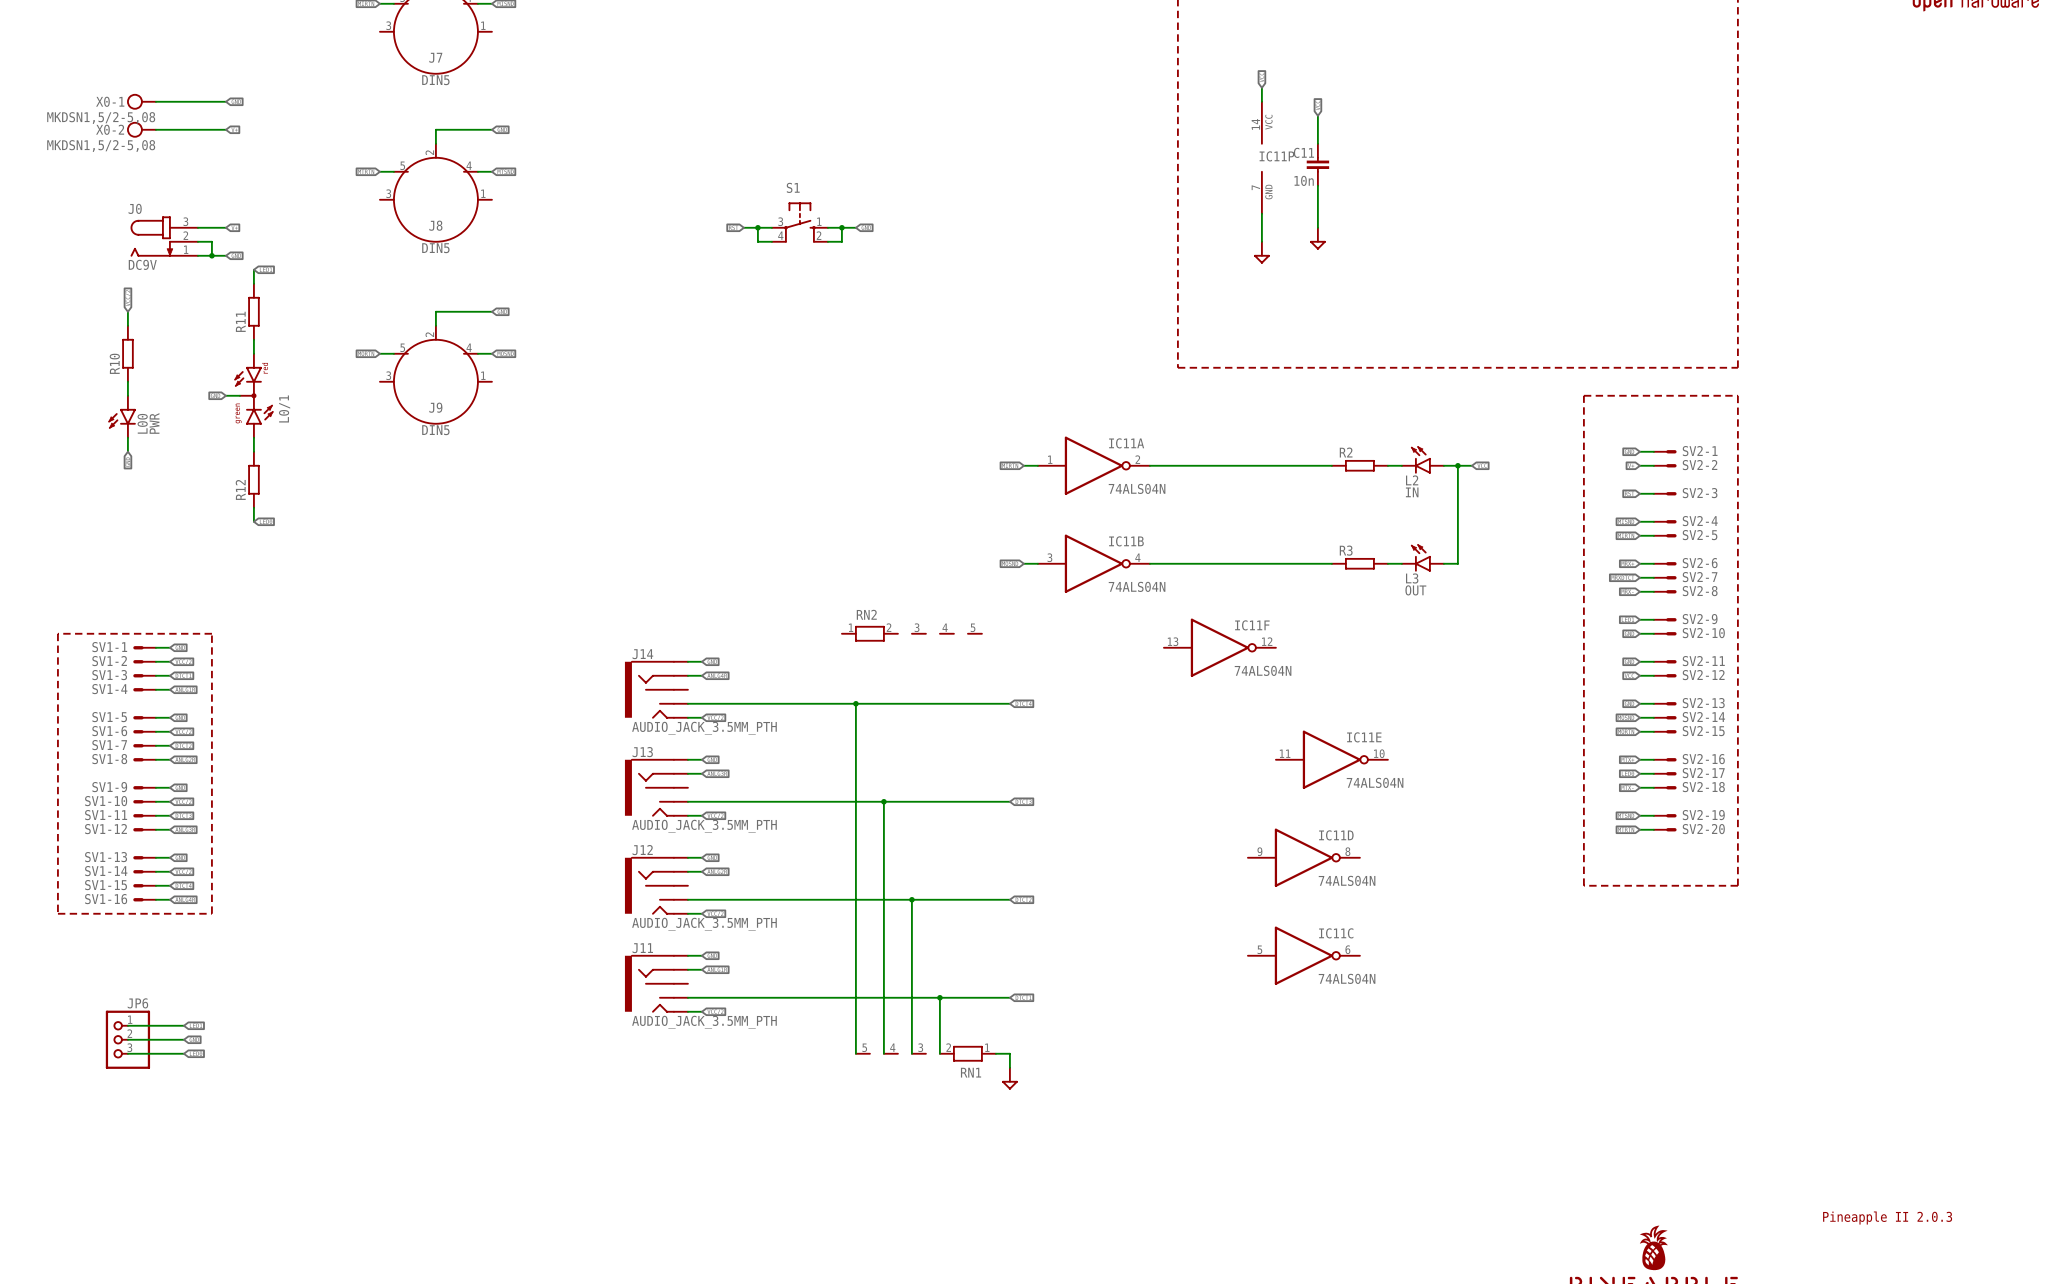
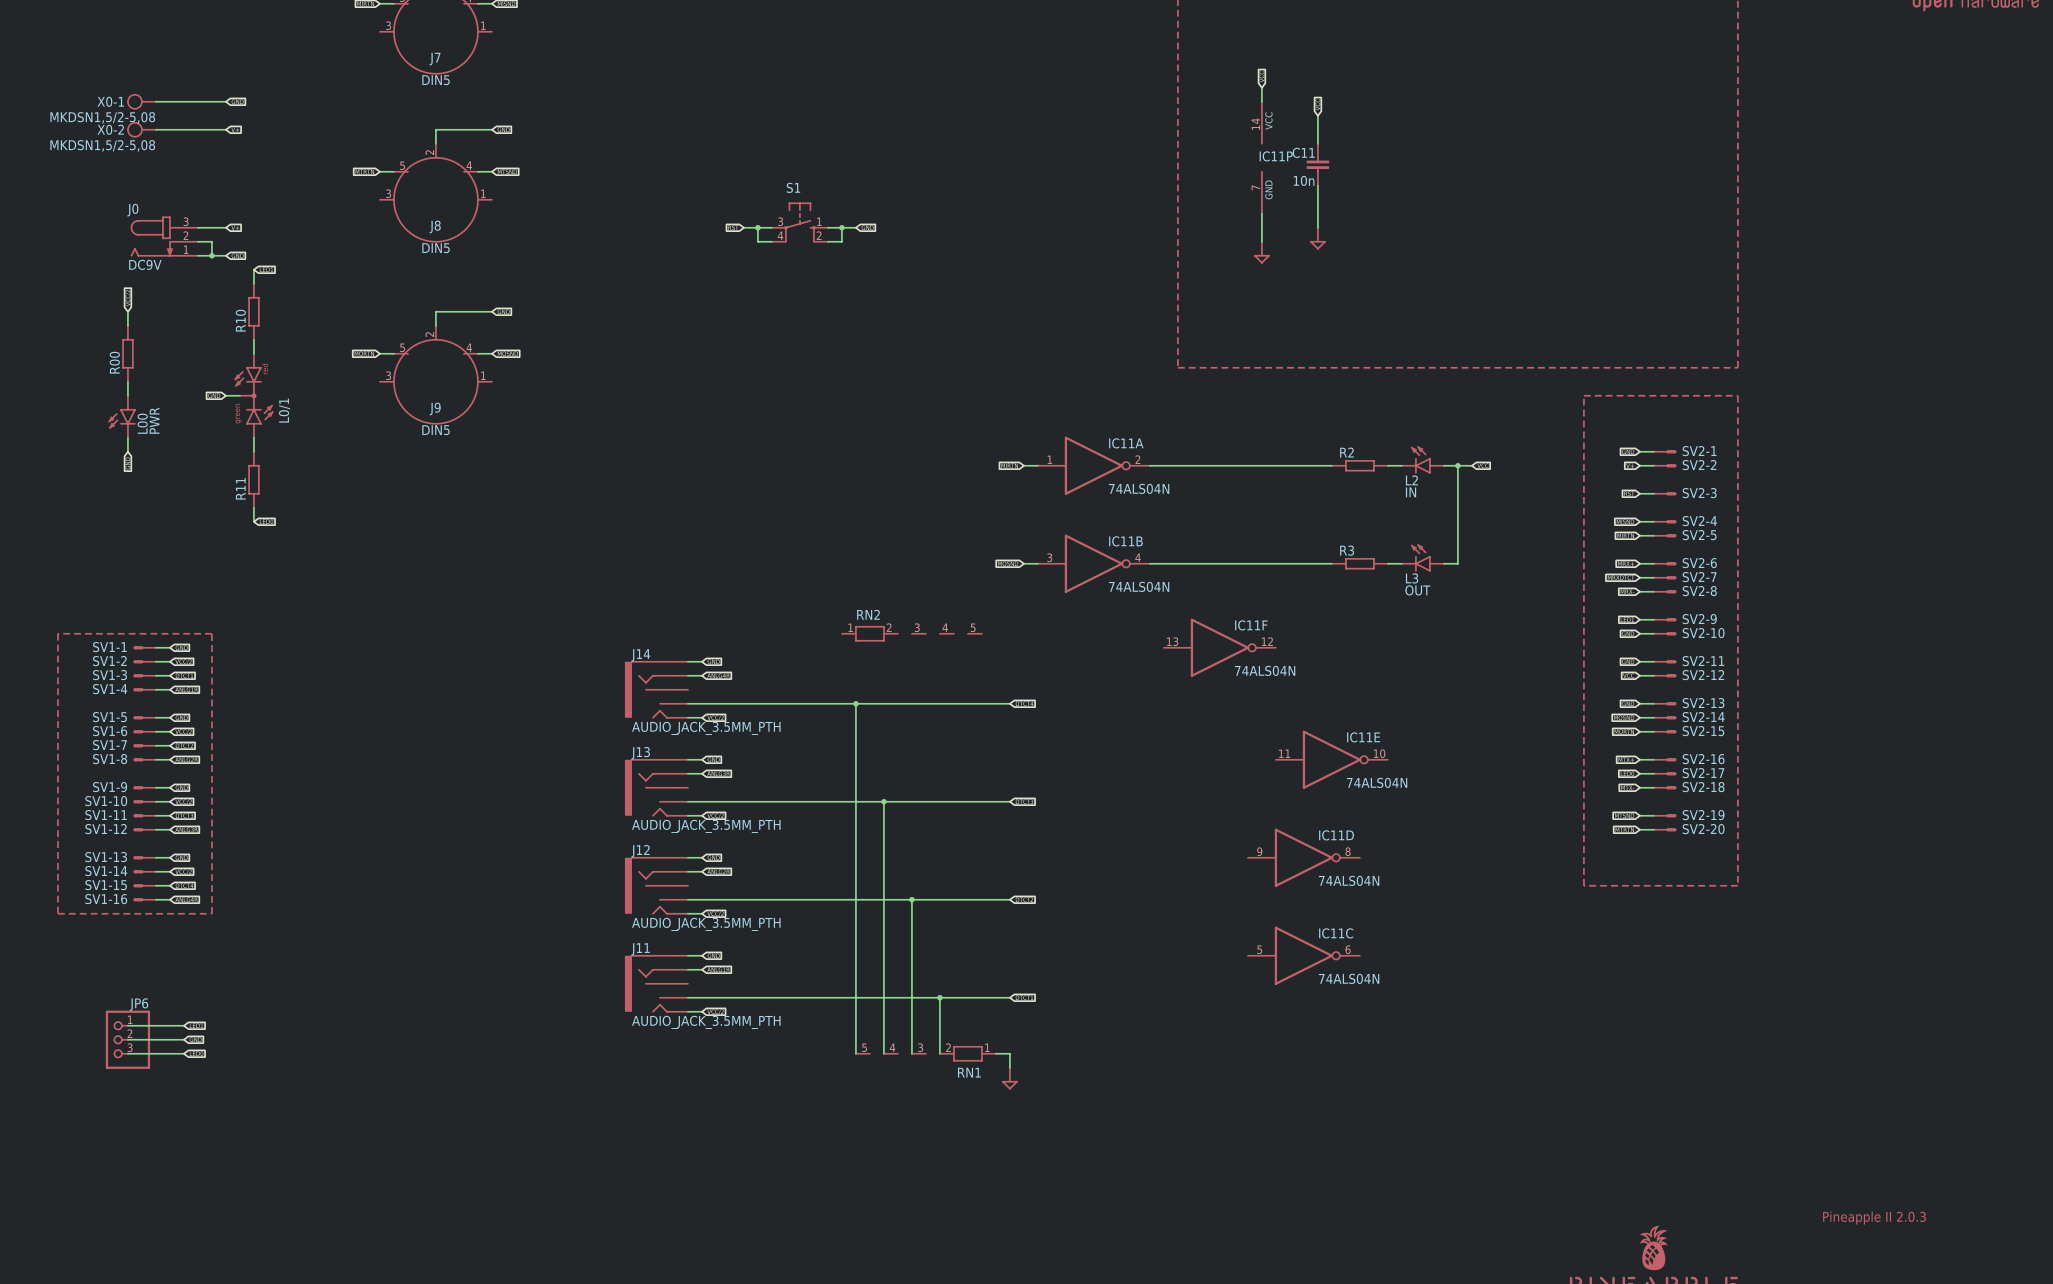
R11 name: R11 (240, 321) -> R10 (240, 320)
R10 name: R10 (114, 363) -> R00 (114, 362)
R12 name: R12 (240, 489) -> R11 (240, 488)

